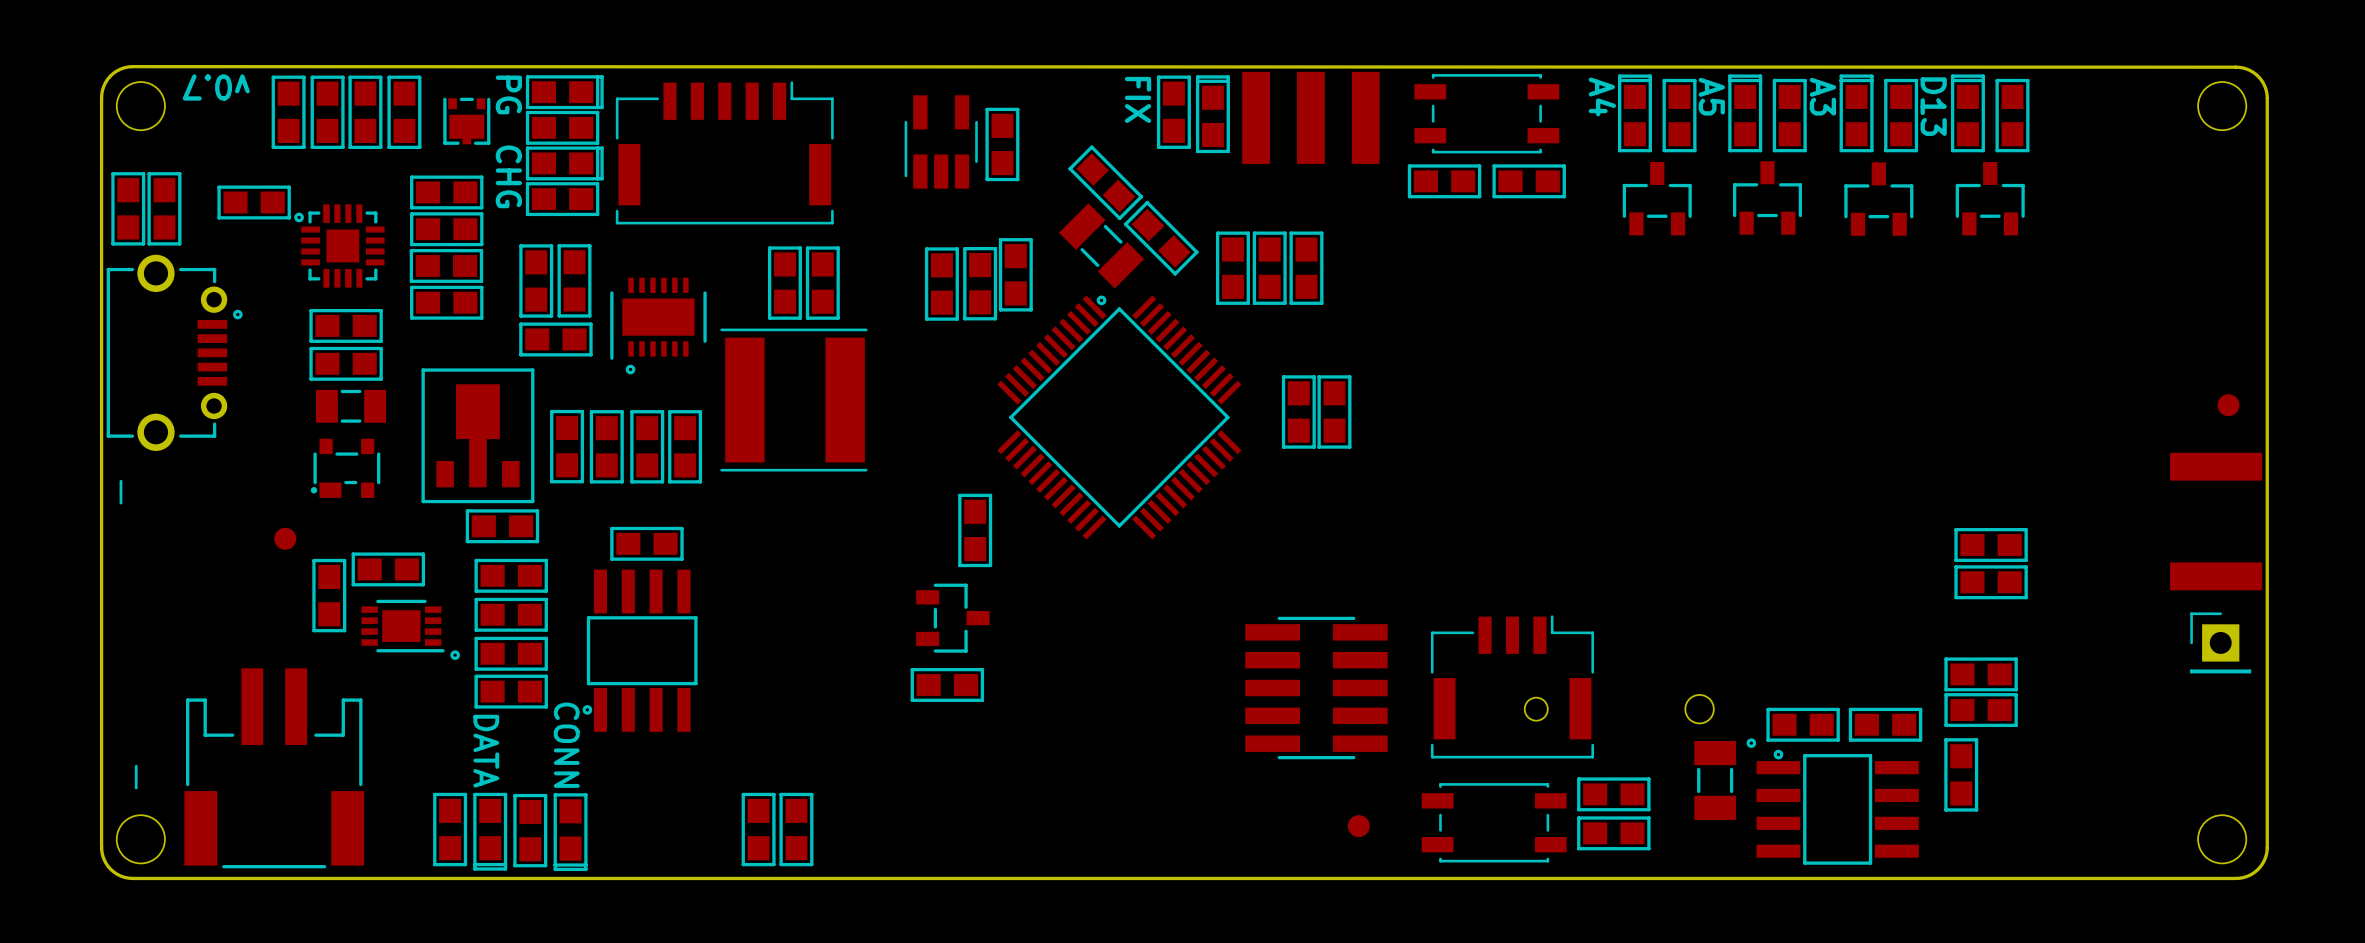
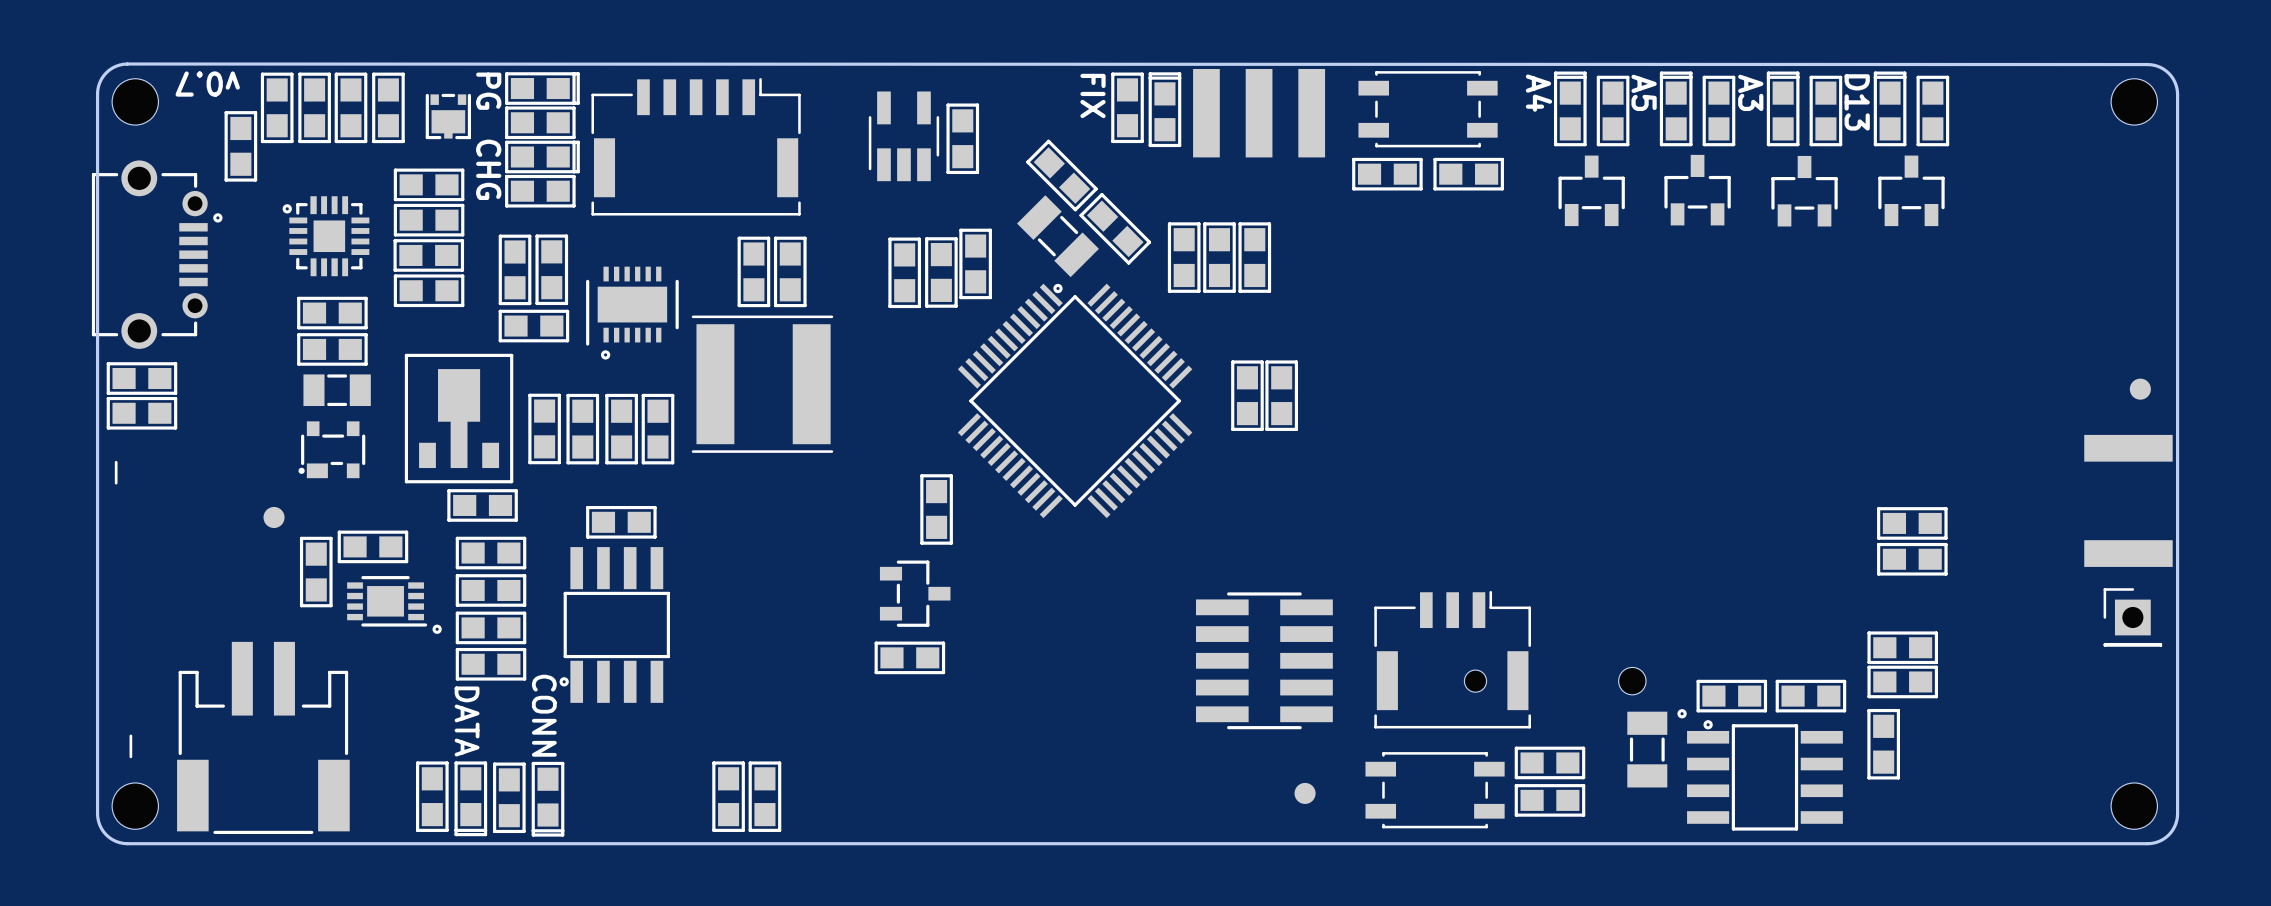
part rotation: 0° (254, 202) -> 90° clockwise (240, 146)
part position: (254, 202) -> (240, 146)
part: (128, 208) -> none
part: (164, 208) -> none
part position: (174, 352) -> (157, 254)
part: none -> (141, 378)
part: none -> (141, 413)

